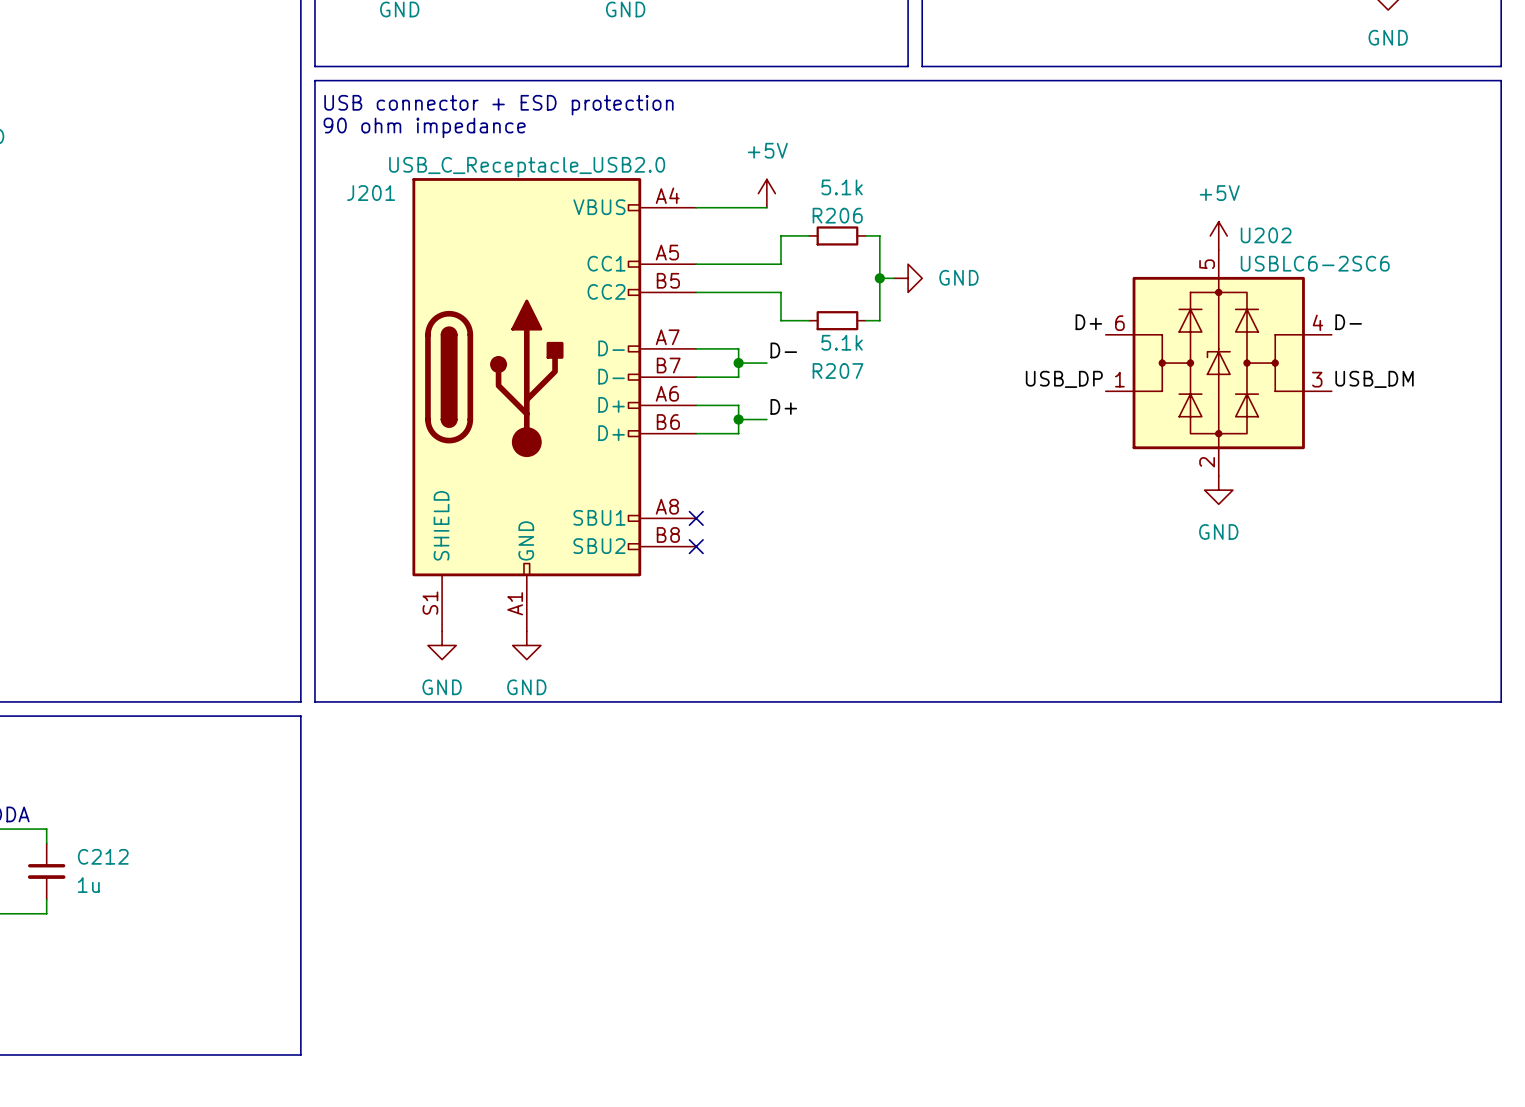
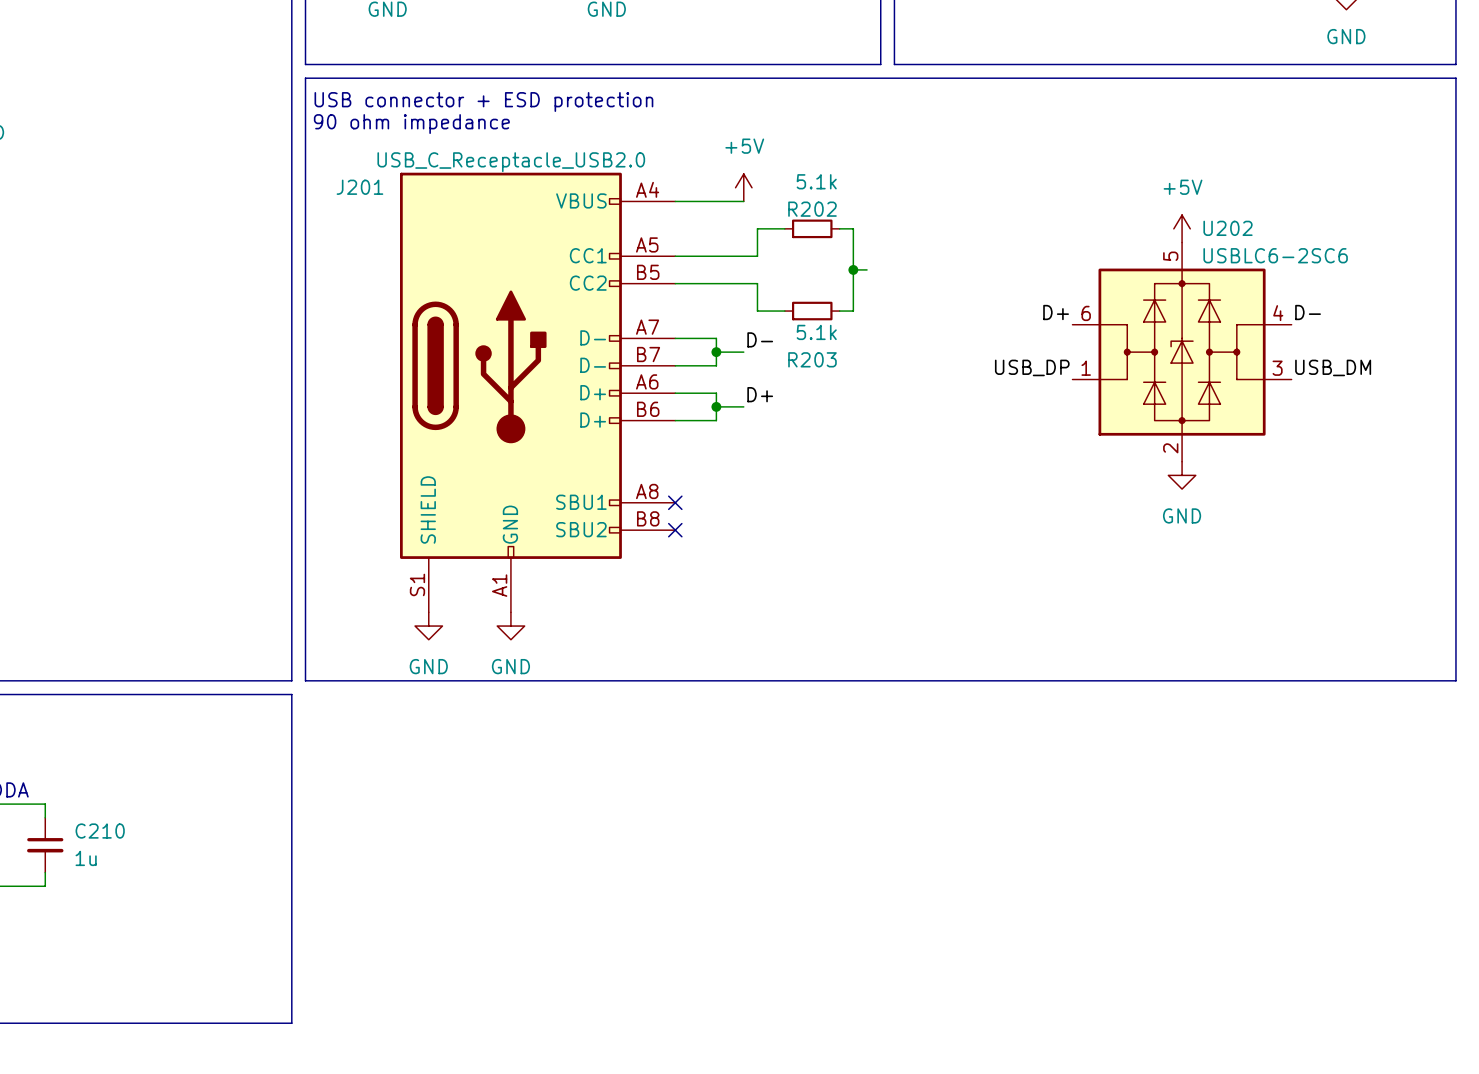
R206 name: R206 (837, 215) -> R202 (812, 209)
power symbol: GND (908, 278) -> none
R207 name: R207 (838, 370) -> R203 (812, 359)
C212 name: C212 (103, 856) -> C210 (100, 831)

